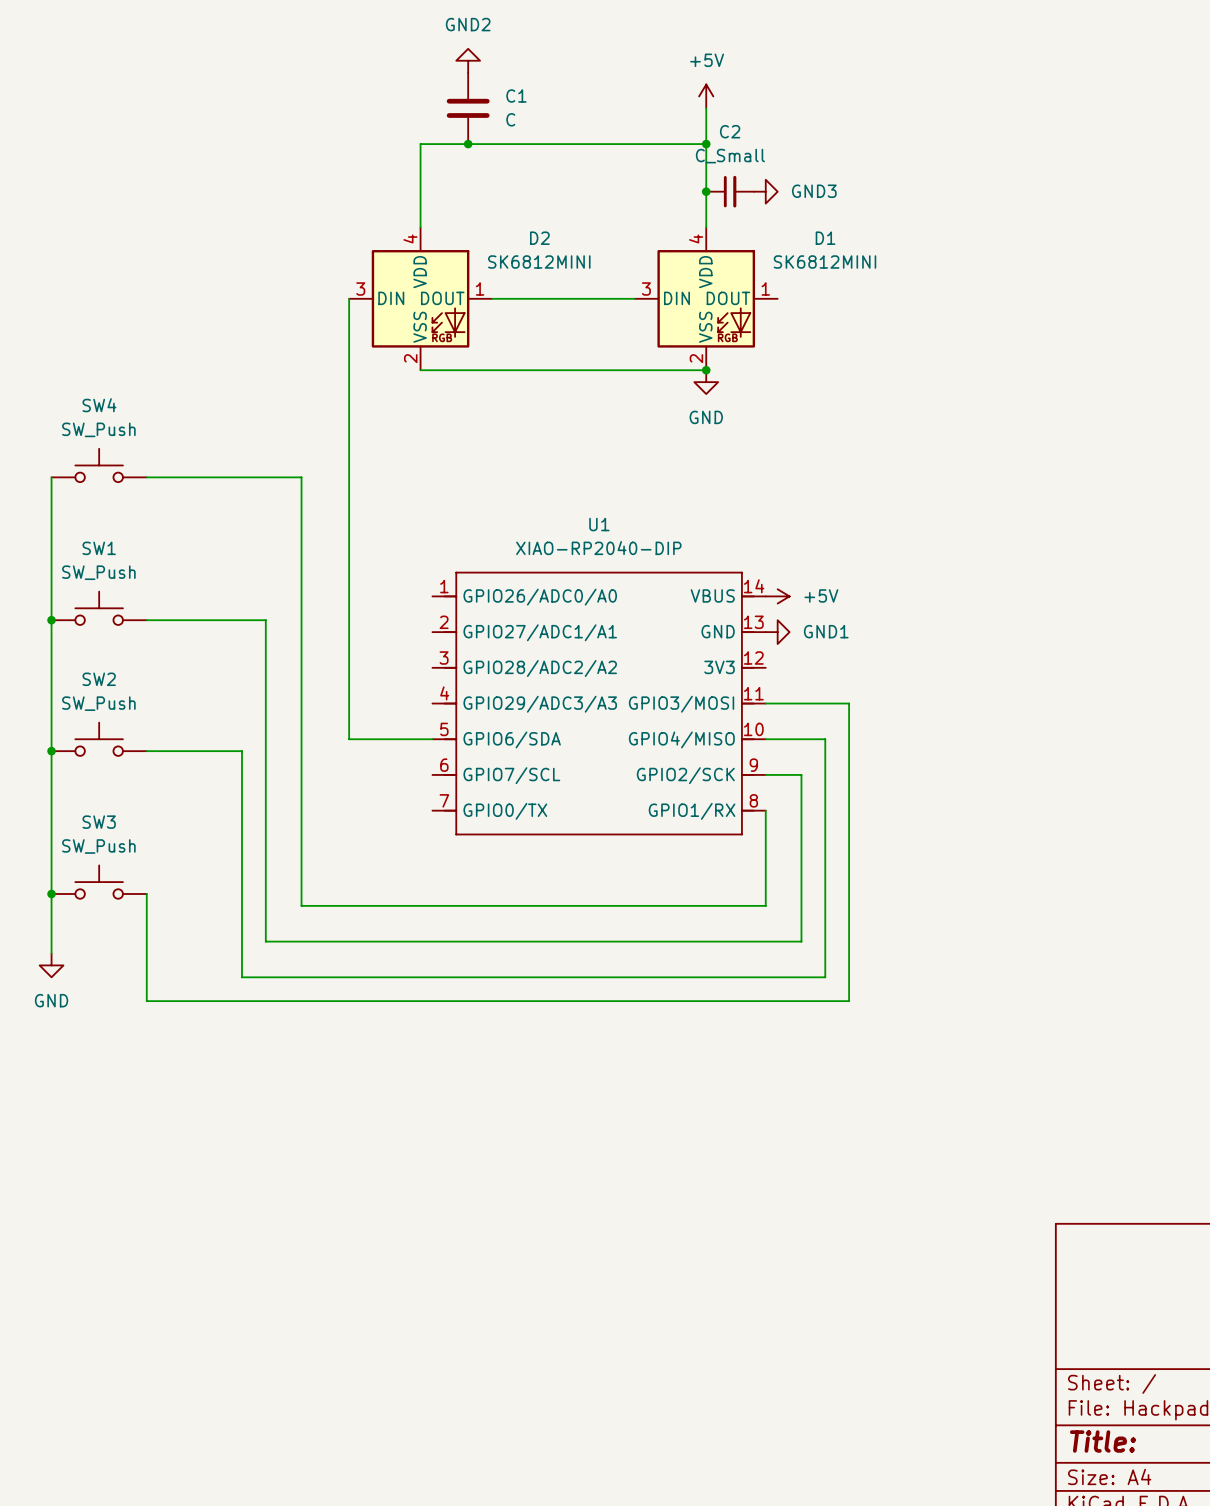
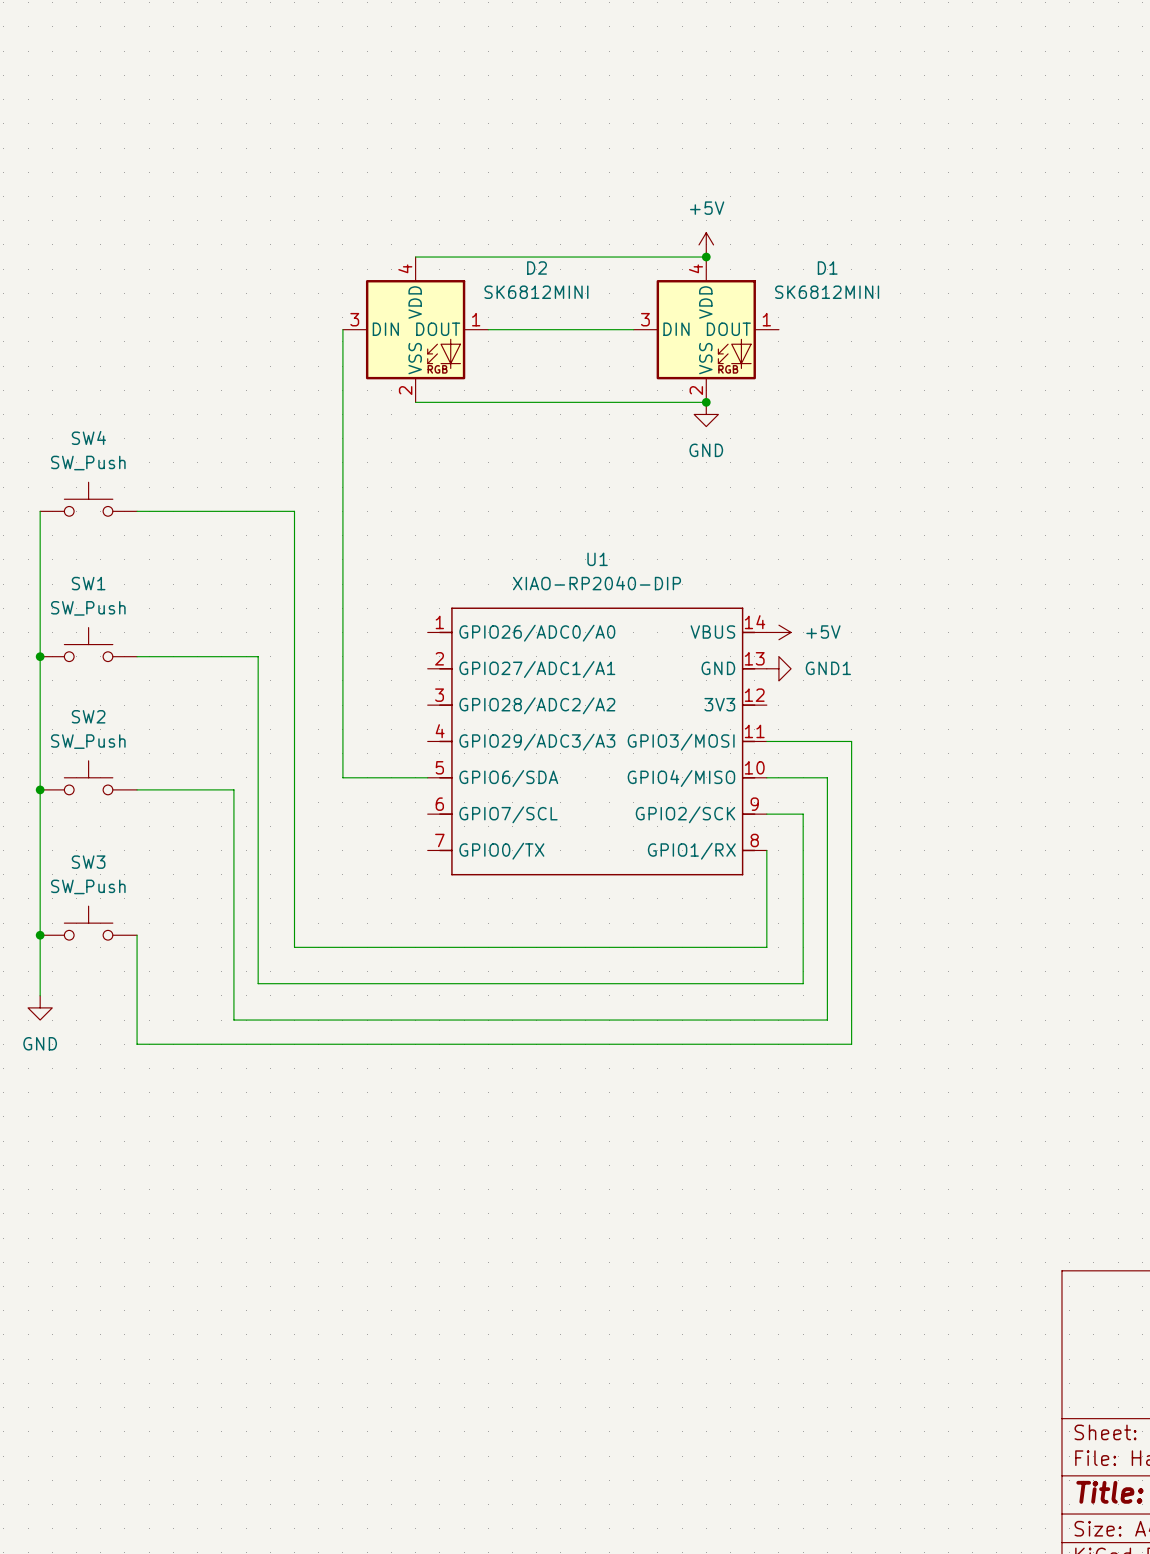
power symbol: GND2 (468, 60) -> none
power symbol position: +5V (706, 96) -> +5V (706, 244)
C1: C (468, 108) -> none
wire: (706, 108) (706, 227) -> none
junction: (468, 144) -> none
wire: (706, 144) (420, 144) (420, 227) -> (706, 257) (415, 257)
junction: (706, 144) -> none
junction position: (706, 191) -> (706, 257)
C2: C_Small (730, 191) -> none
power symbol: GND3 (765, 191) -> none

